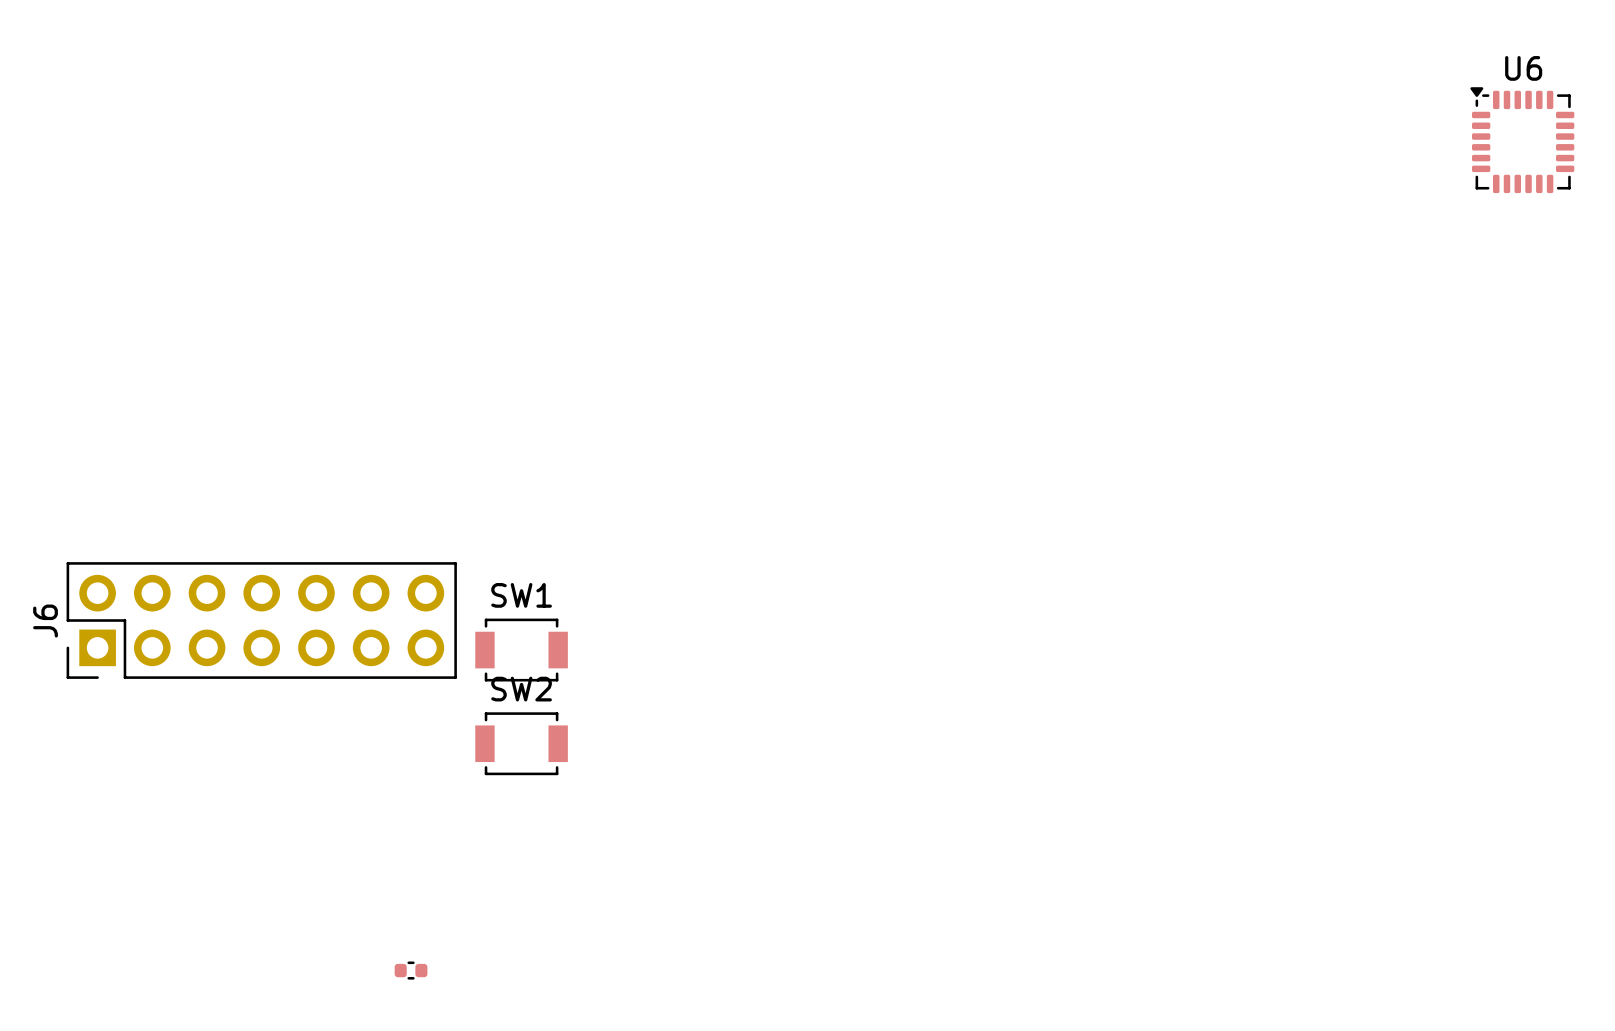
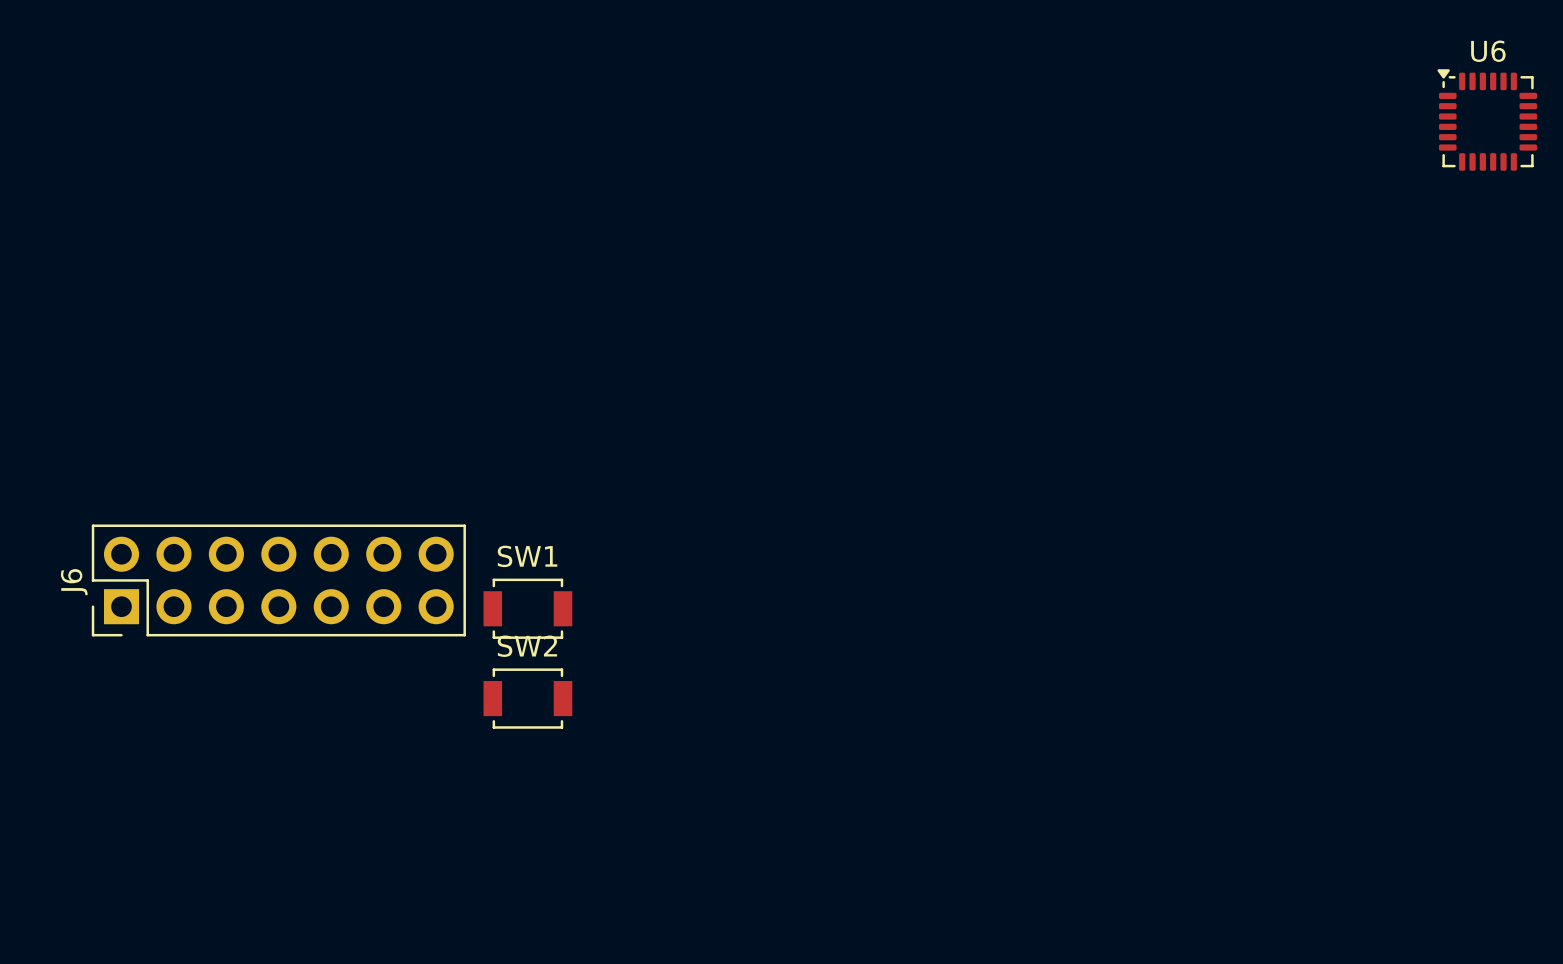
part: (411, 970) -> none

